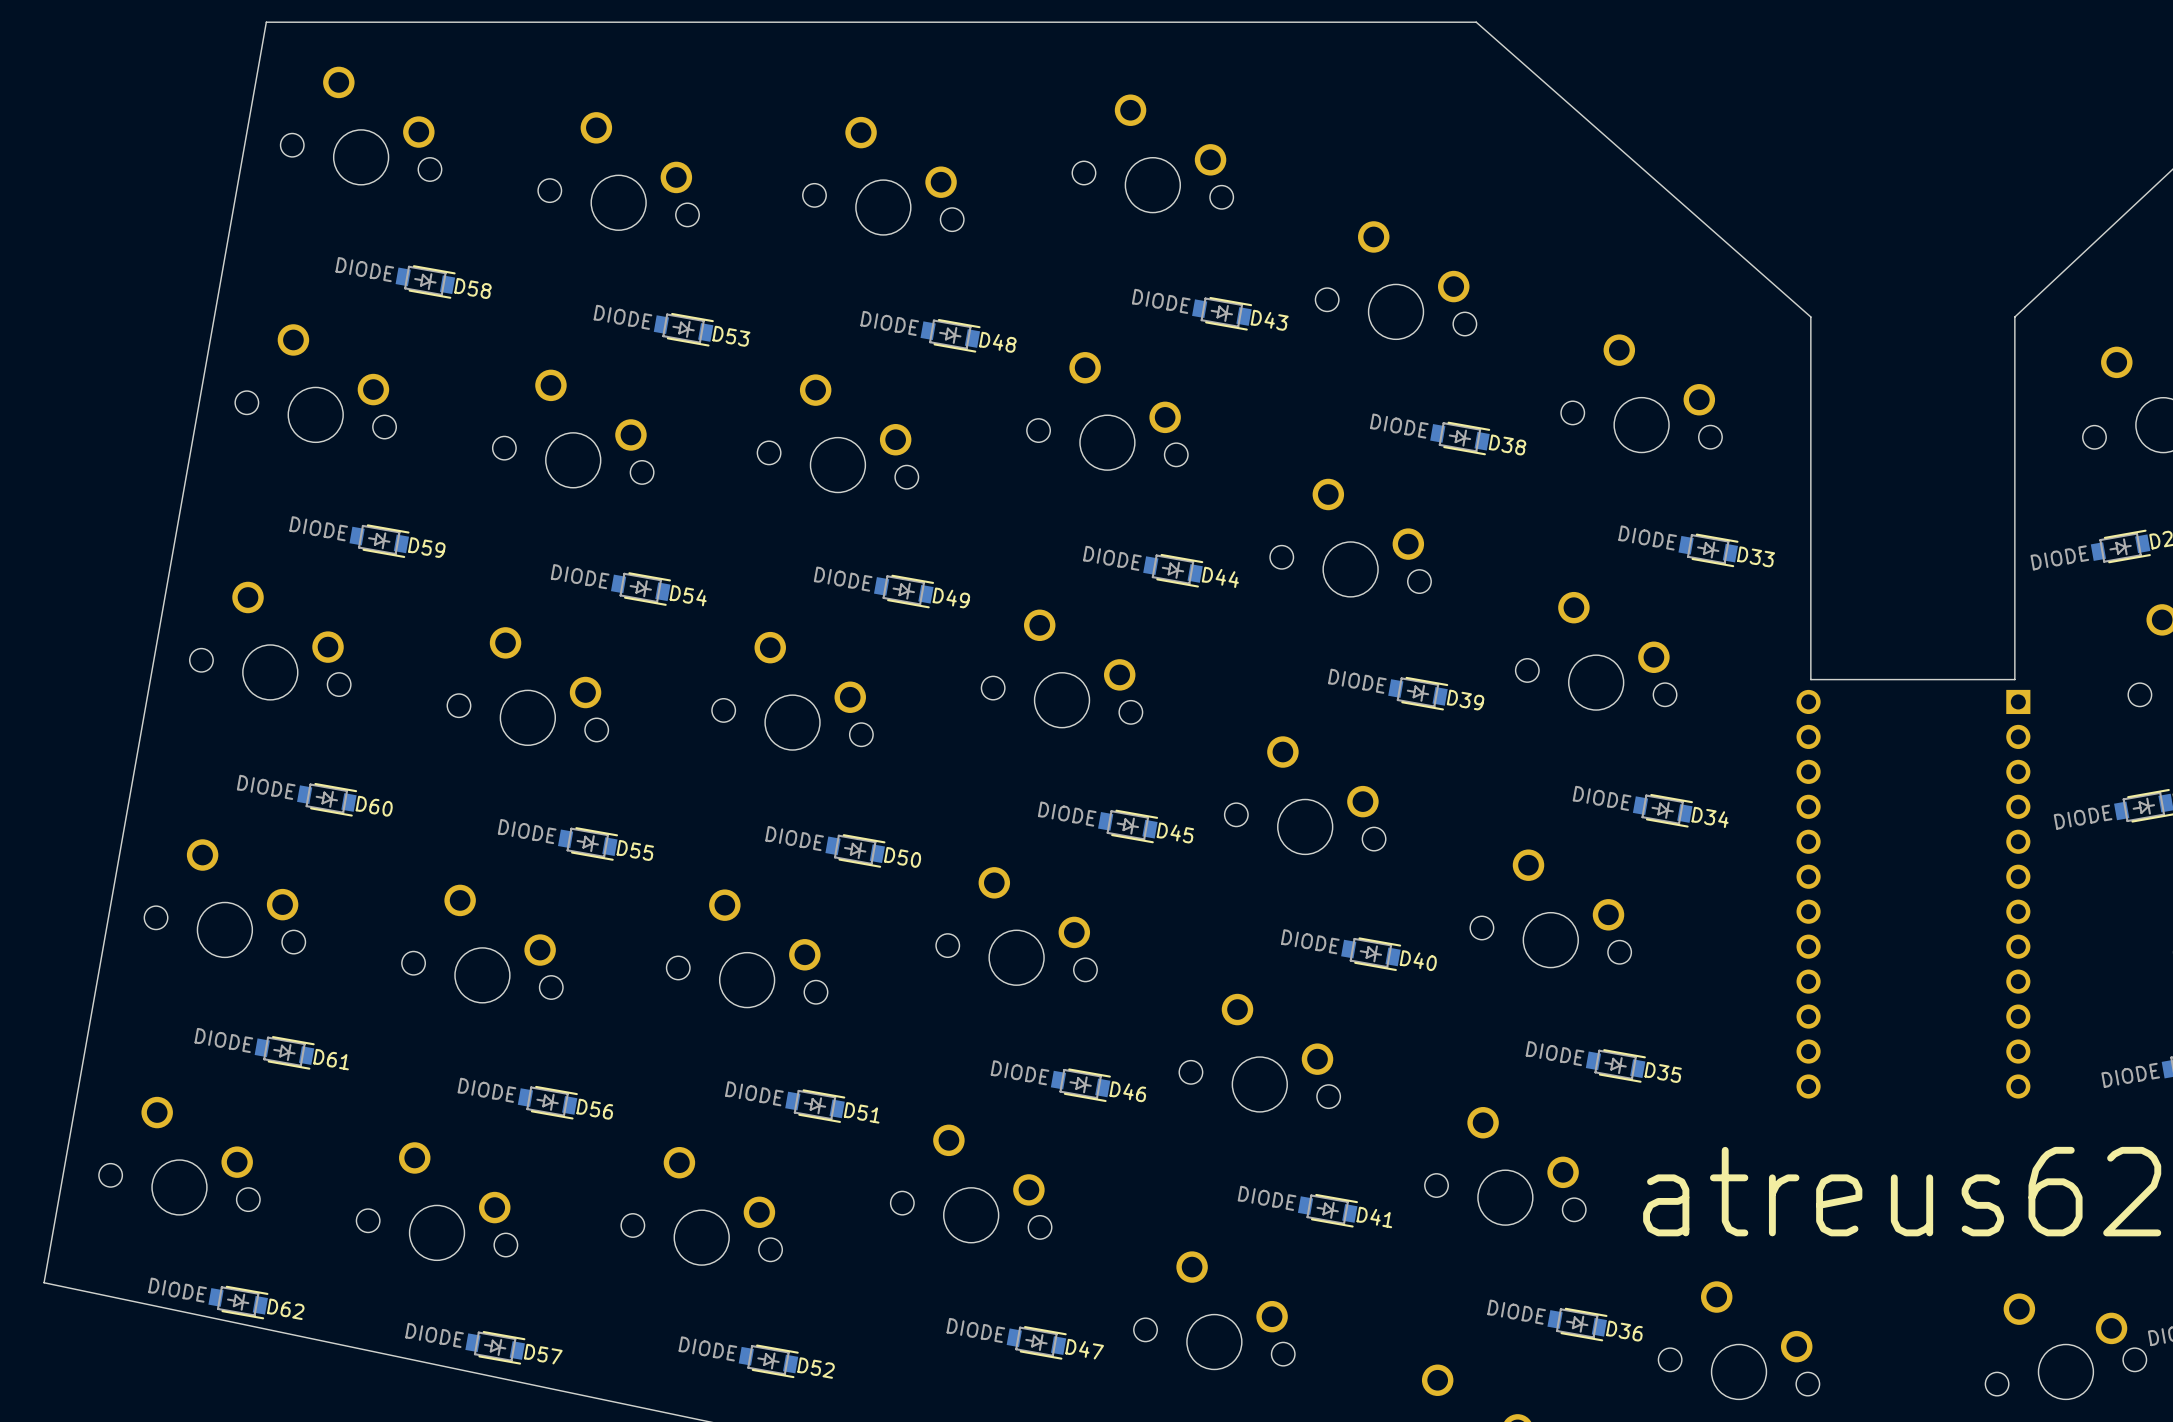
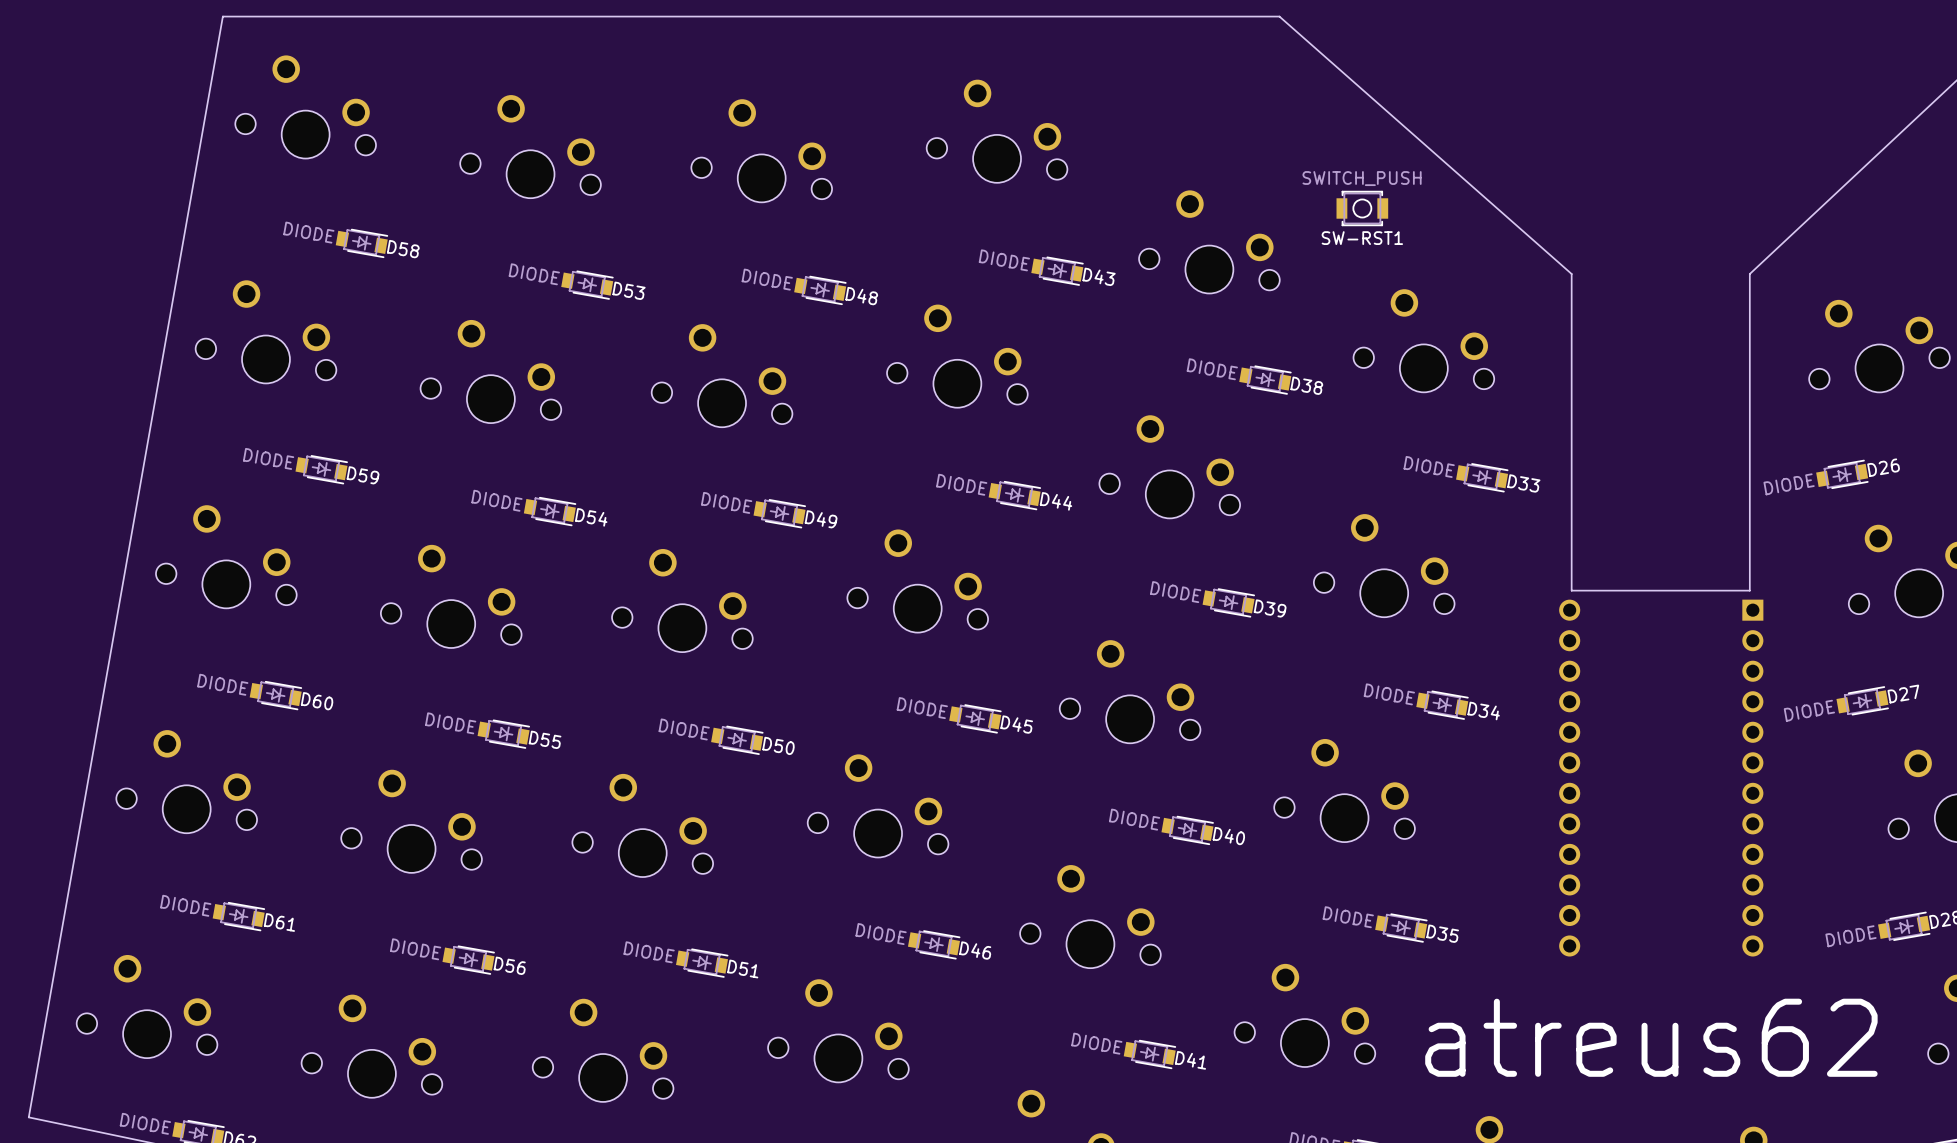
SW-RST1: none -> SWITCH_PUSH (1362, 208)

